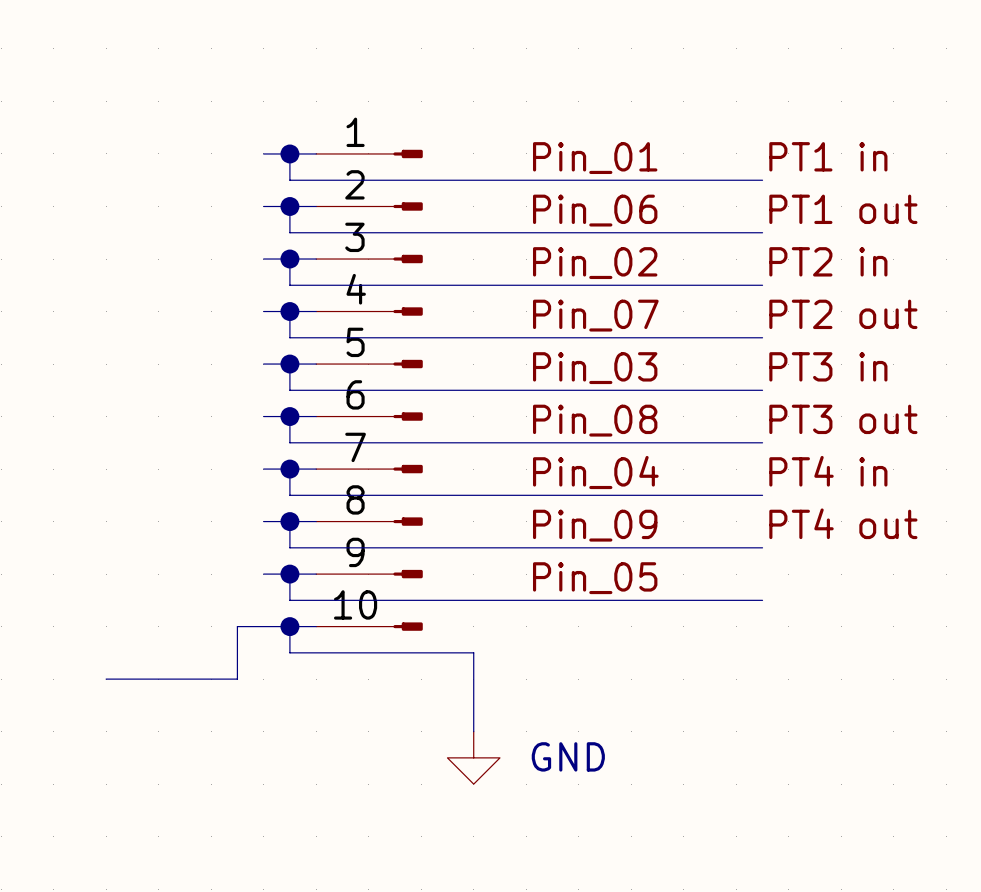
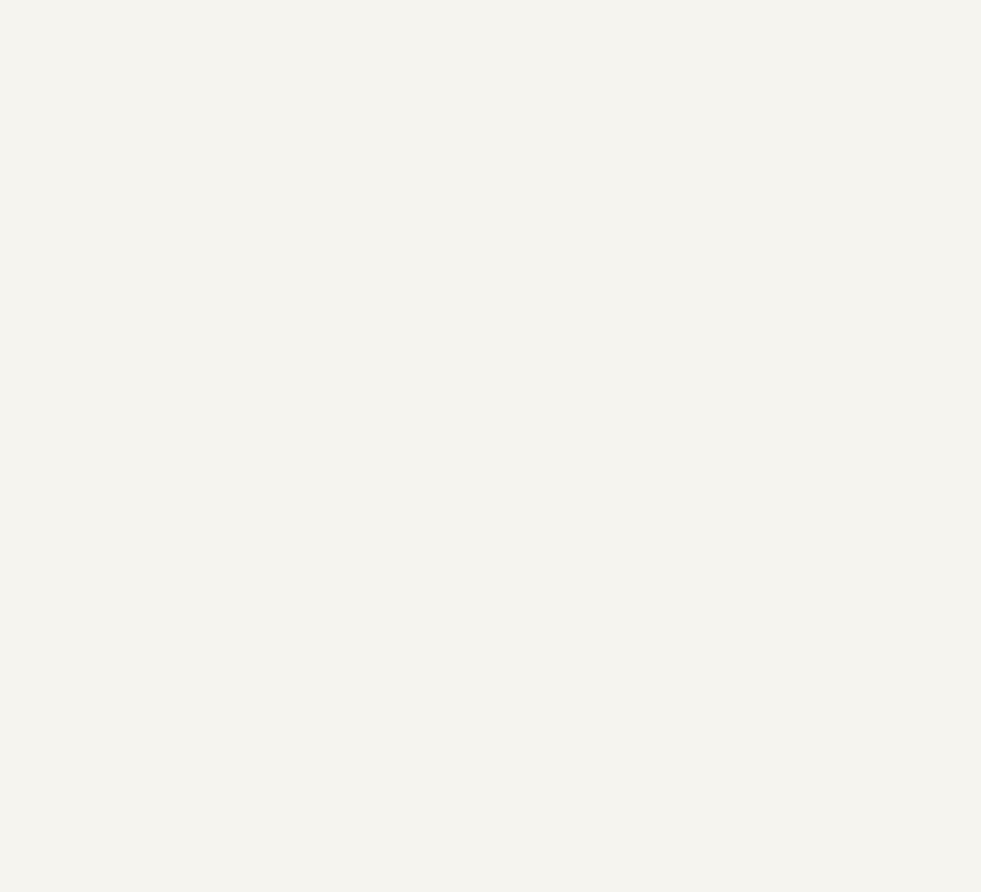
wire: (263, 153) (316, 153) -> none
wire: (289, 153) (289, 180) (762, 180) -> none
junction: (289, 153) -> none
label: PT1 in (828, 156) -> none
label: Pin_01 (595, 158) -> none
wire: (263, 206) (316, 206) -> none
wire: (289, 206) (289, 232) (762, 232) -> none
junction: (289, 206) -> none
label: PT1 out (843, 209) -> none
label: Pin_06 (595, 210) -> none
wire: (263, 259) (316, 259) -> none
wire: (289, 259) (289, 285) (762, 285) -> none
junction: (289, 259) -> none
label: PT2 in (828, 261) -> none
label: Pin_02 (595, 263) -> none
wire: (263, 311) (316, 311) -> none
wire: (289, 311) (289, 337) (762, 337) -> none
junction: (289, 311) -> none
label: PT2 out (843, 314) -> none
label: Pin_07 (595, 315) -> none
wire: (263, 364) (316, 364) -> none
wire: (289, 364) (289, 390) (762, 390) -> none
junction: (289, 364) -> none
label: PT3 in (828, 366) -> none
label: Pin_03 (595, 368) -> none
part: (369, 390) -> none
wire: (263, 416) (316, 416) -> none
wire: (289, 416) (289, 442) (762, 442) -> none
junction: (289, 416) -> none
label: PT3 out (843, 419) -> none
label: Pin_08 (595, 420) -> none
wire: (263, 469) (316, 469) -> none
wire: (289, 469) (289, 495) (762, 495) -> none
junction: (289, 469) -> none
label: PT4 in (828, 471) -> none
label: Pin_04 (595, 472) -> none
wire: (263, 521) (316, 521) -> none
wire: (289, 521) (289, 547) (762, 547) -> none
junction: (289, 521) -> none
label: PT4 out (843, 523) -> none
label: Pin_09 (595, 525) -> none
wire: (263, 574) (316, 574) -> none
wire: (289, 574) (289, 600) (762, 600) -> none
junction: (289, 574) -> none
label: Pin_05 (595, 578) -> none
wire: (289, 626) (289, 652) (473, 652) (473, 731) -> none
junction: (289, 626) -> none
wire: (316, 626) (237, 626) (237, 679) (106, 679) -> none
power symbol: GND (473, 757) -> none

